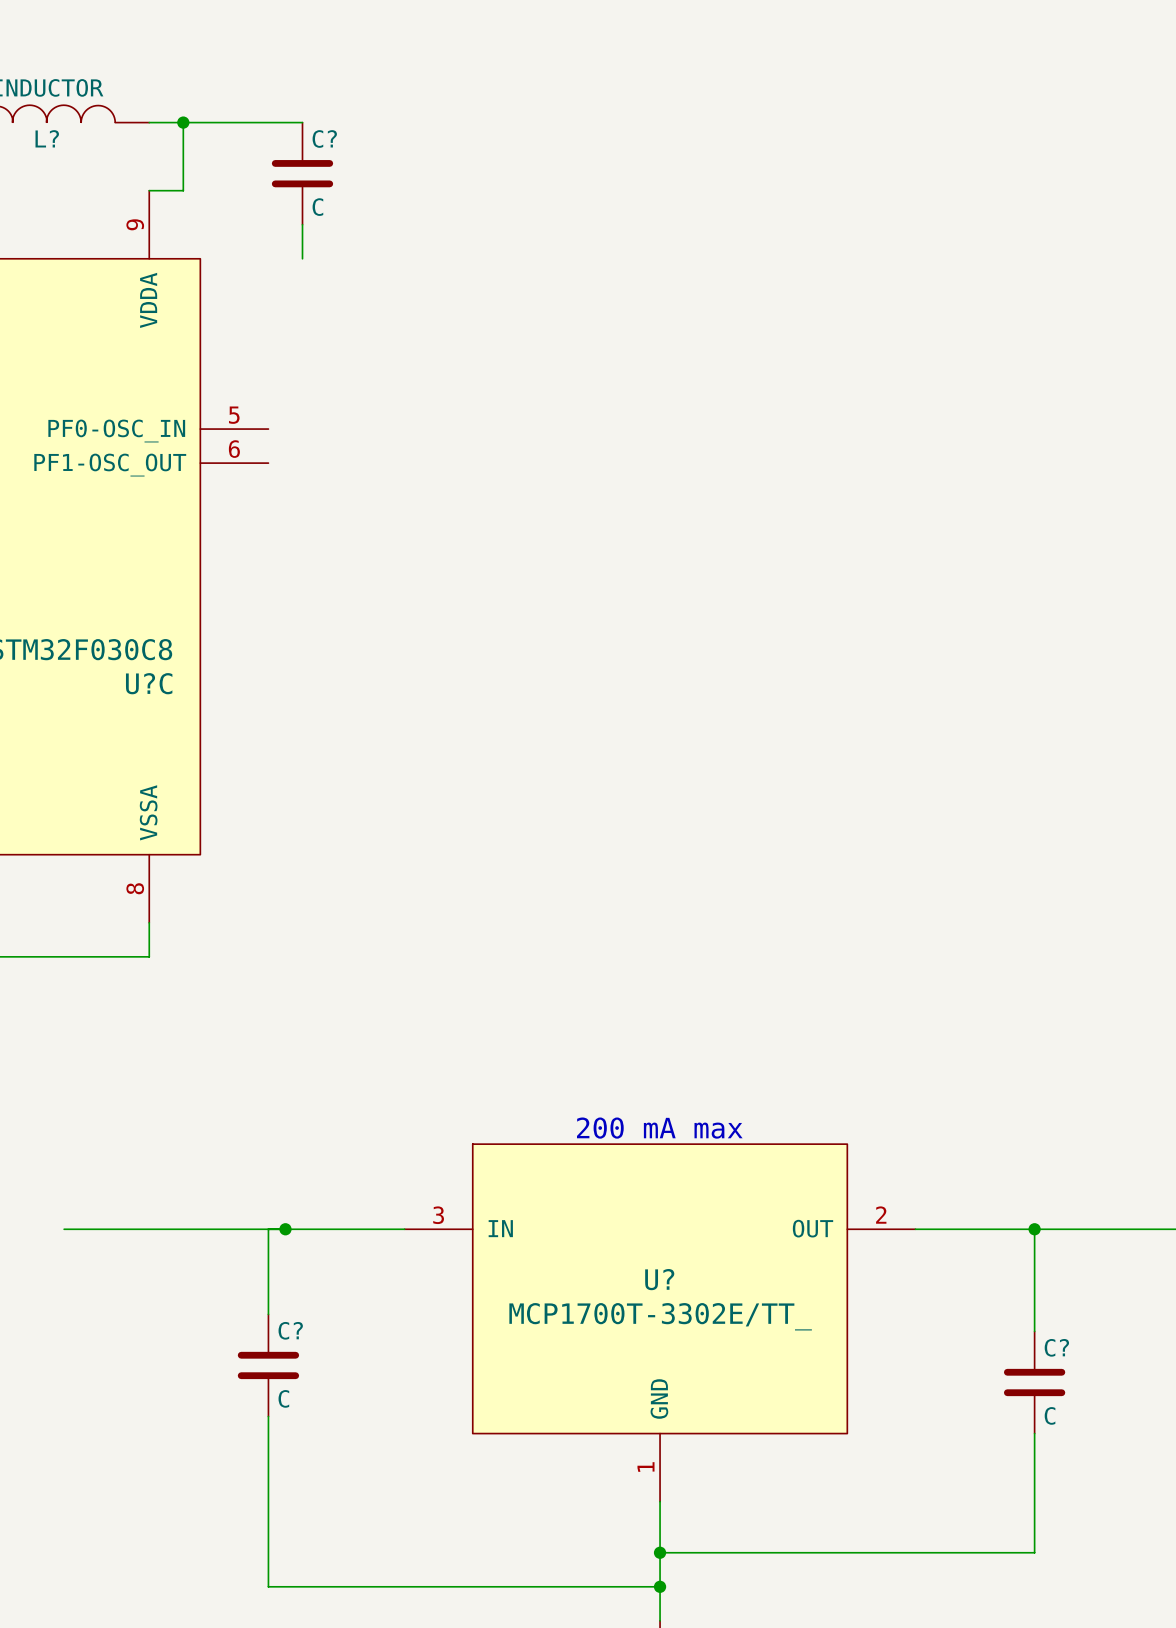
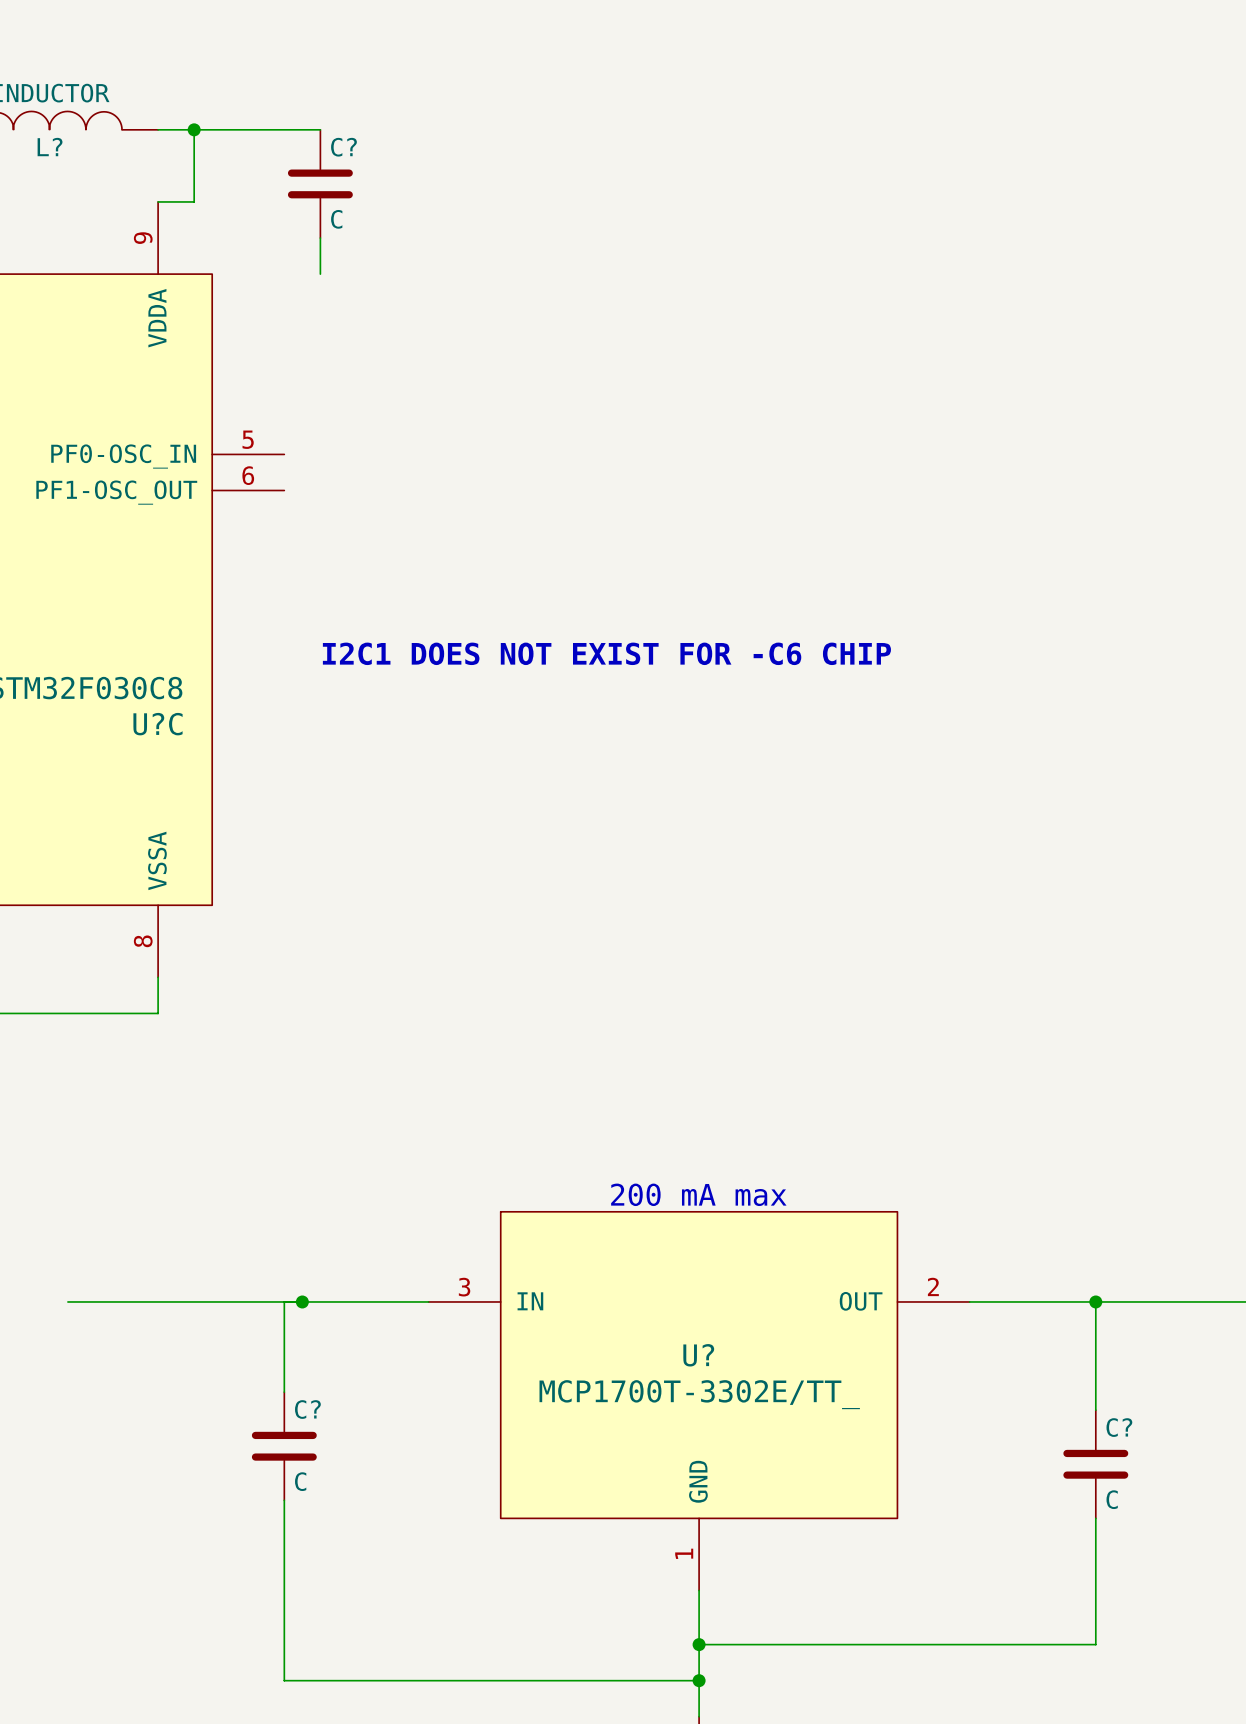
text: none -> I2C1 DOES NOT EXIST FOR -C6 CHIP (606, 653)

